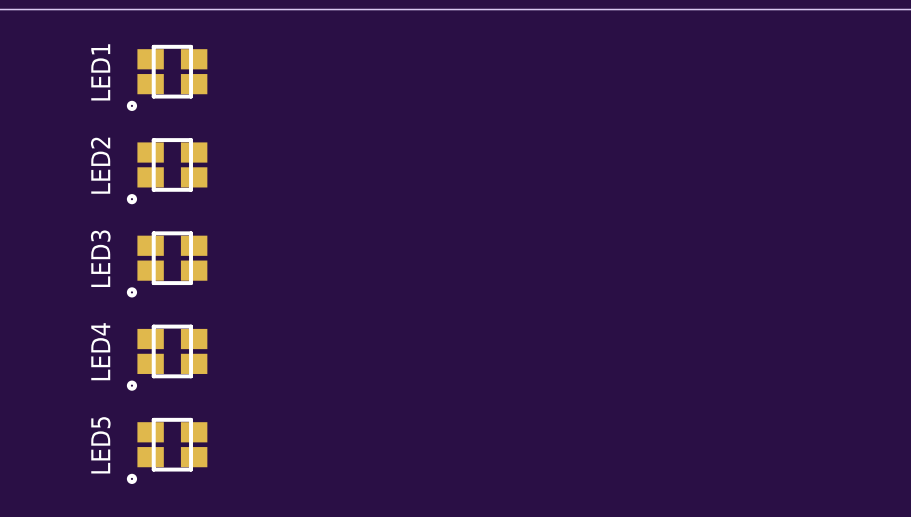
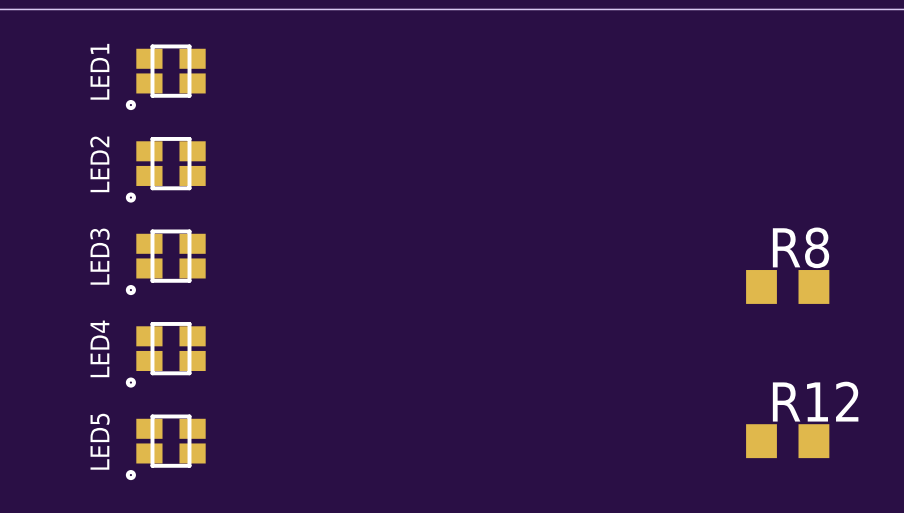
R8: none -> (787, 286)
R12: none -> (787, 441)

